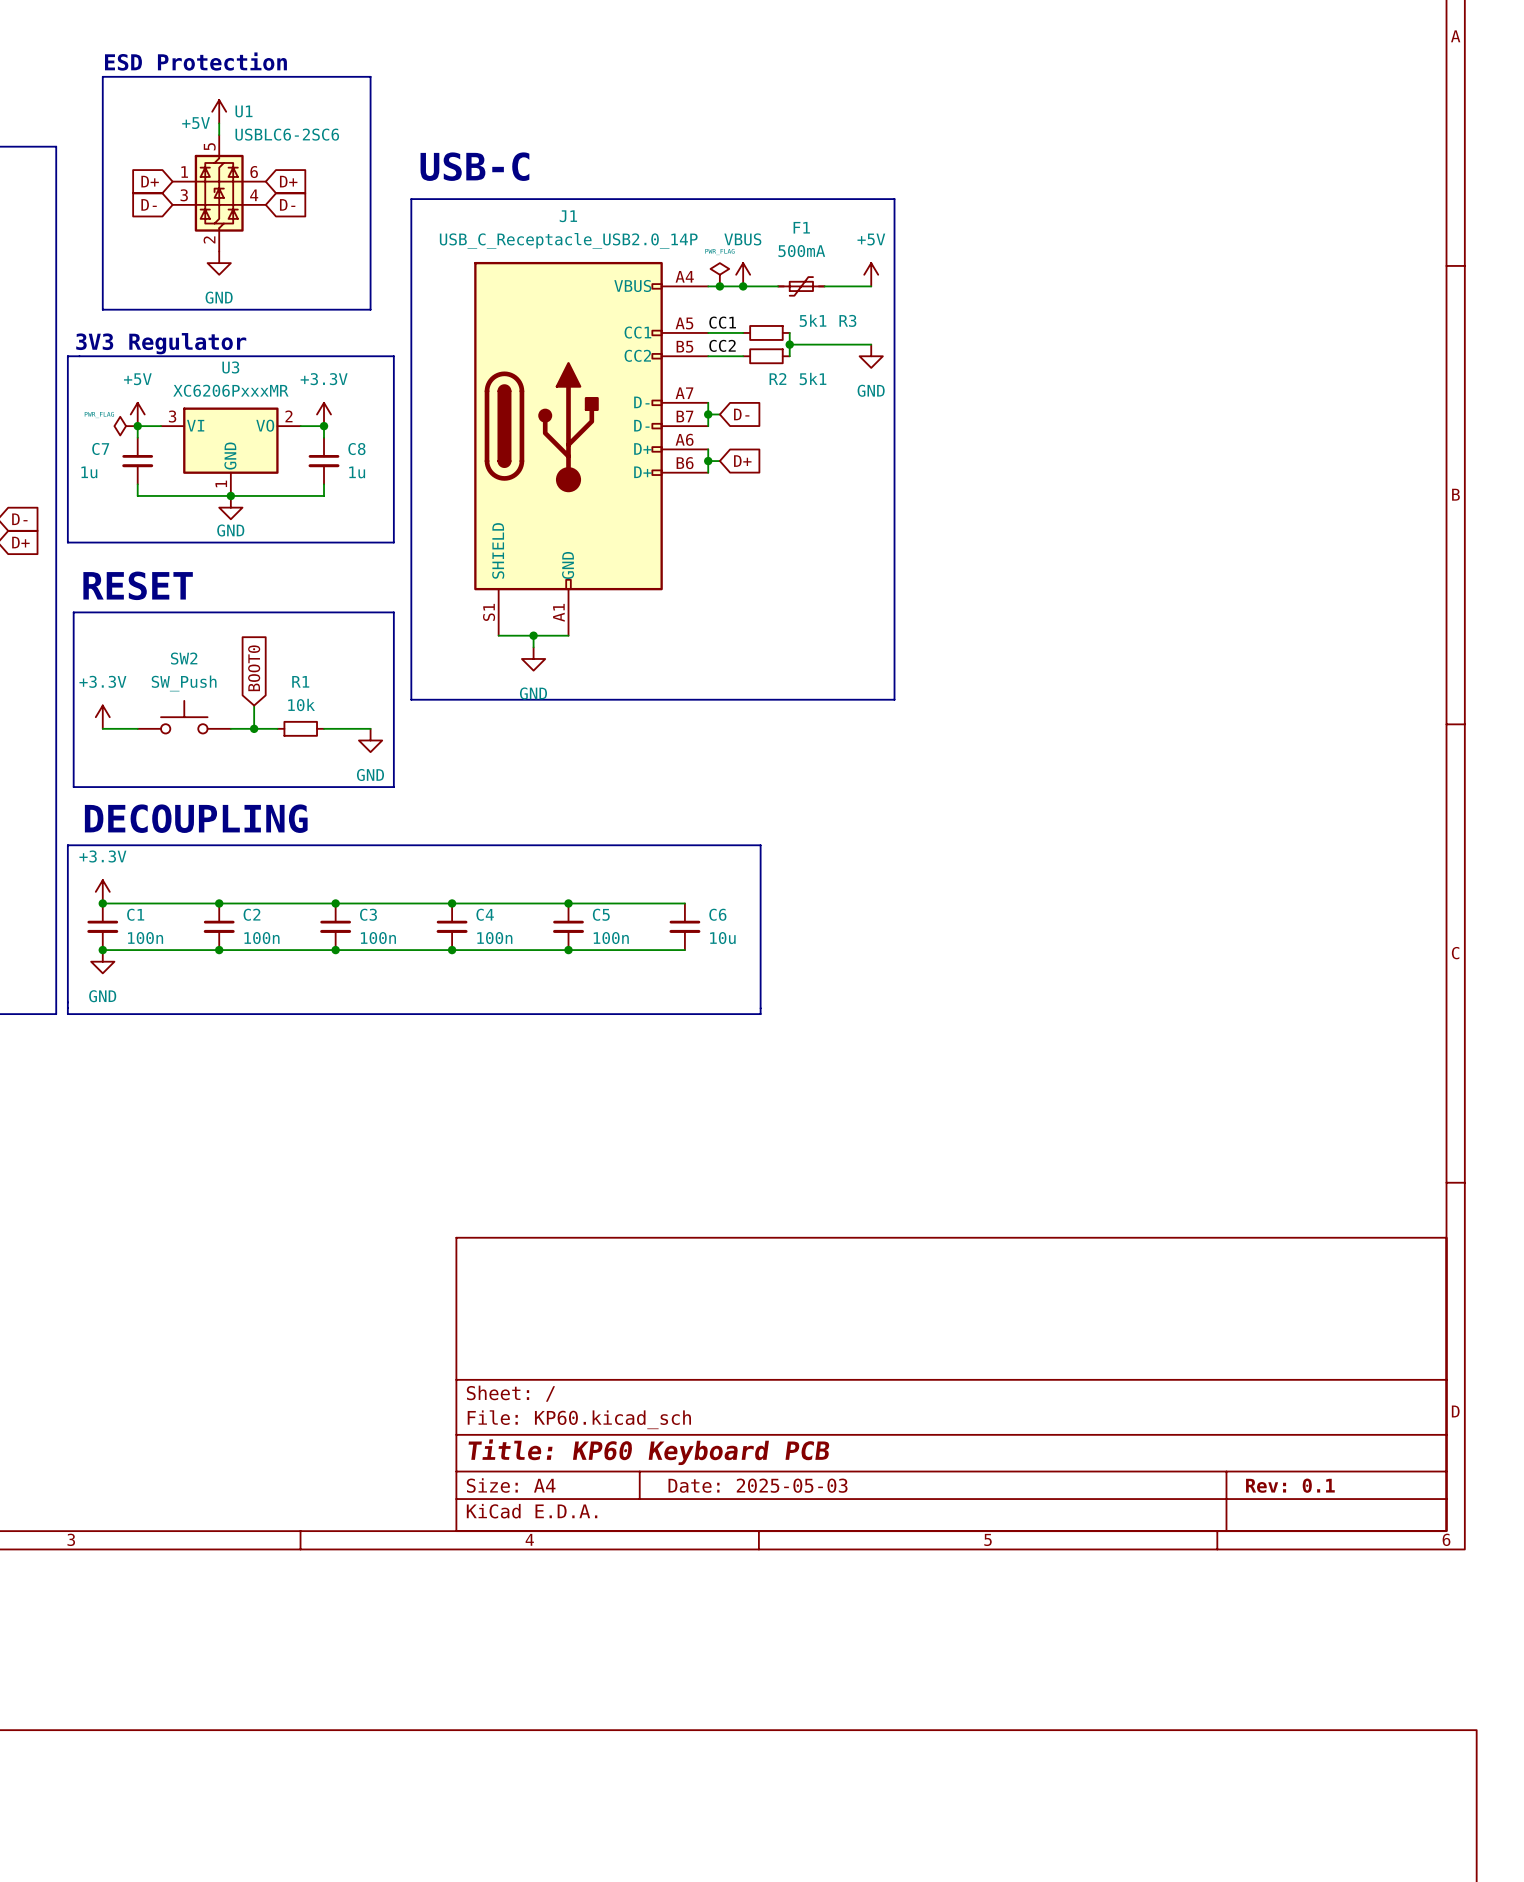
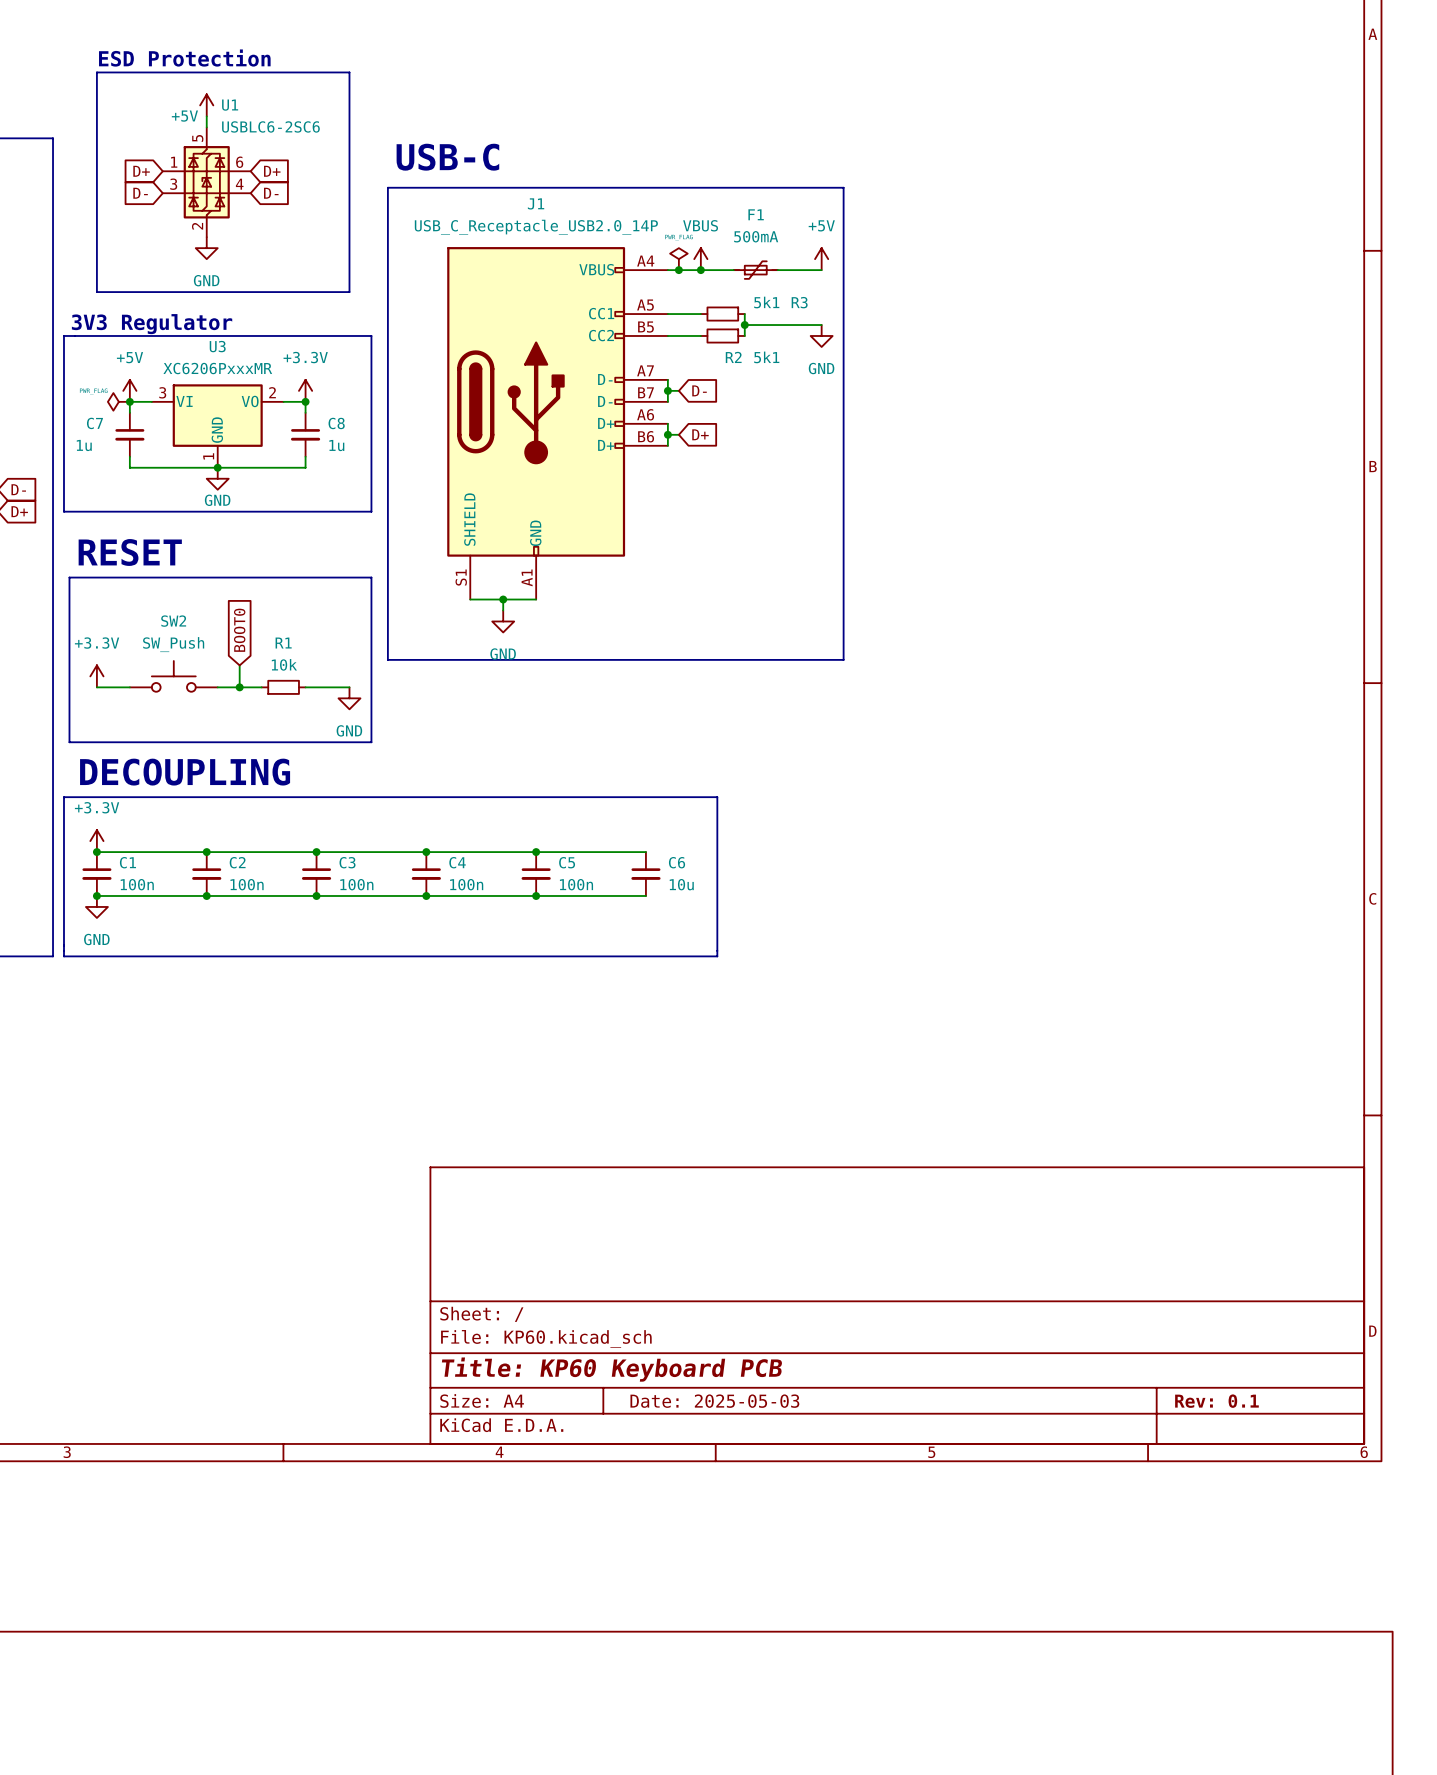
label: CC1 (722, 322) -> none
label: CC2 (722, 345) -> none

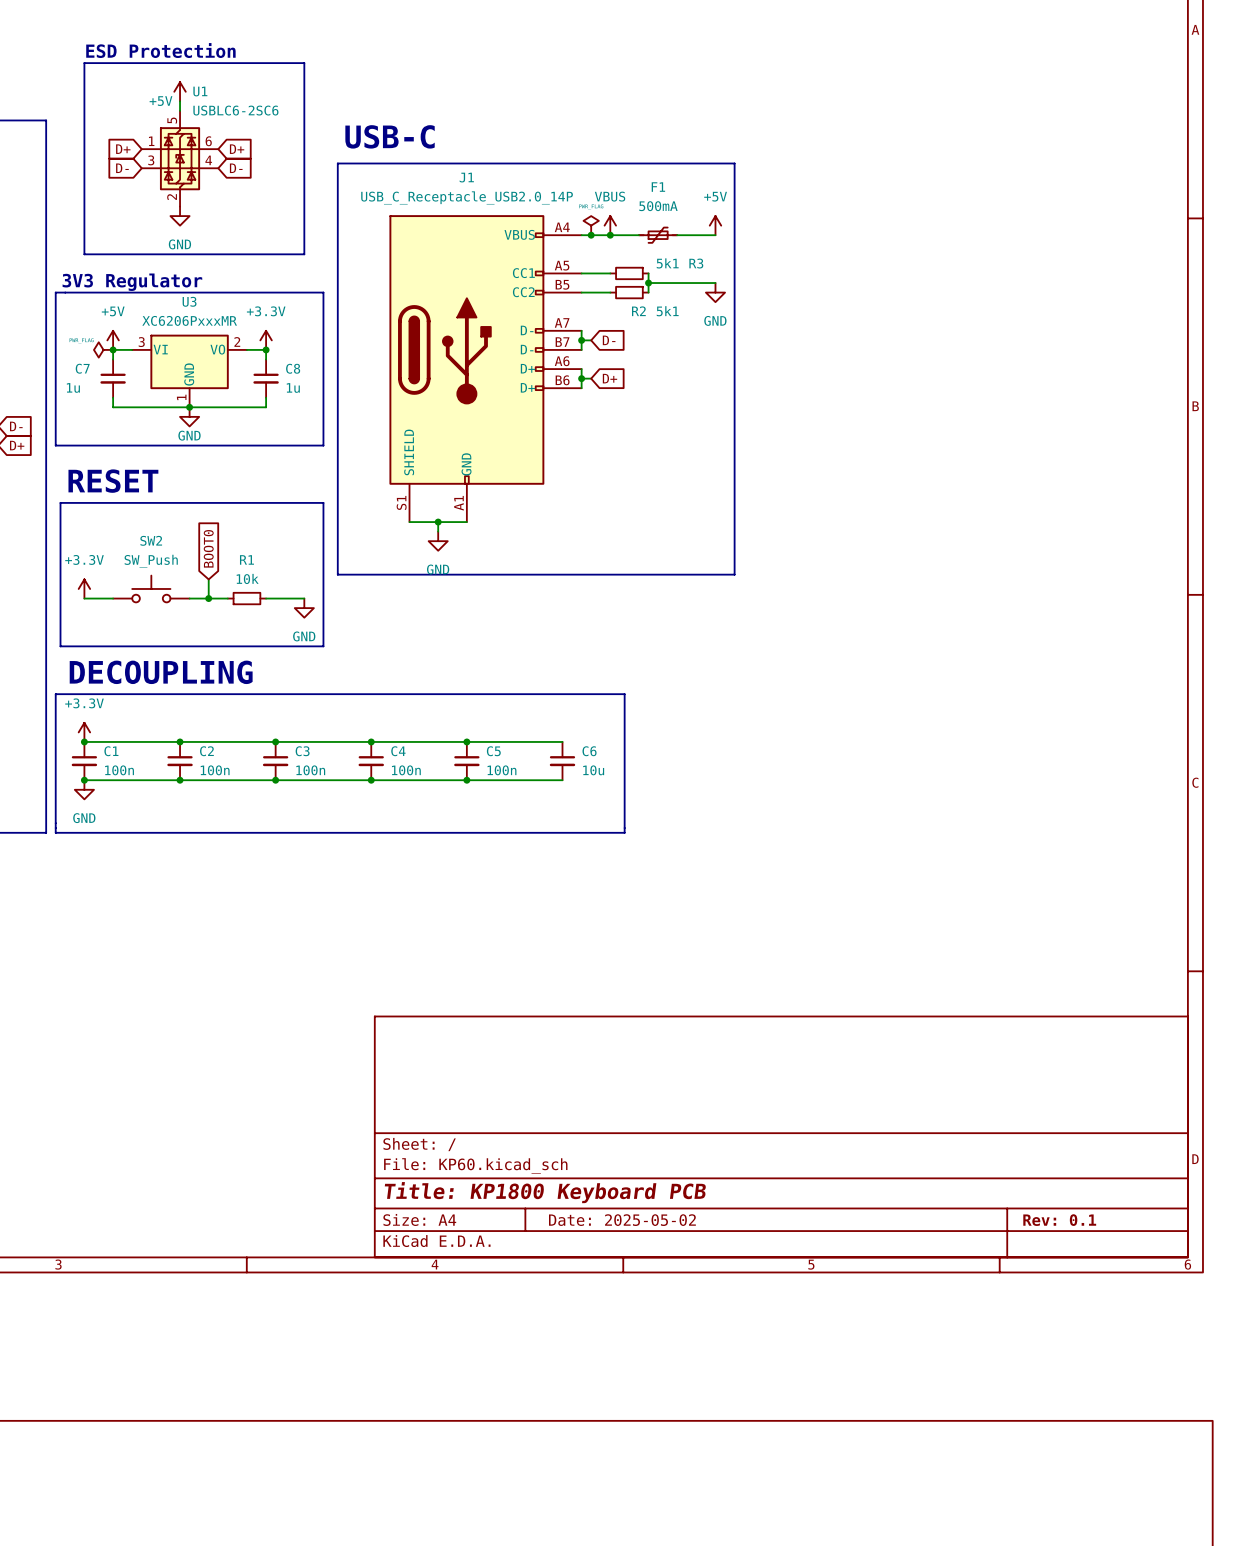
title block: Title: KP60 Keyboard PCB (612, 1369) -> Title: KP1800 Keyboard PCB (545, 1192)
title block: Date: 2025-05-03 (714, 1401) -> Date: 2025-05-02 (622, 1220)

